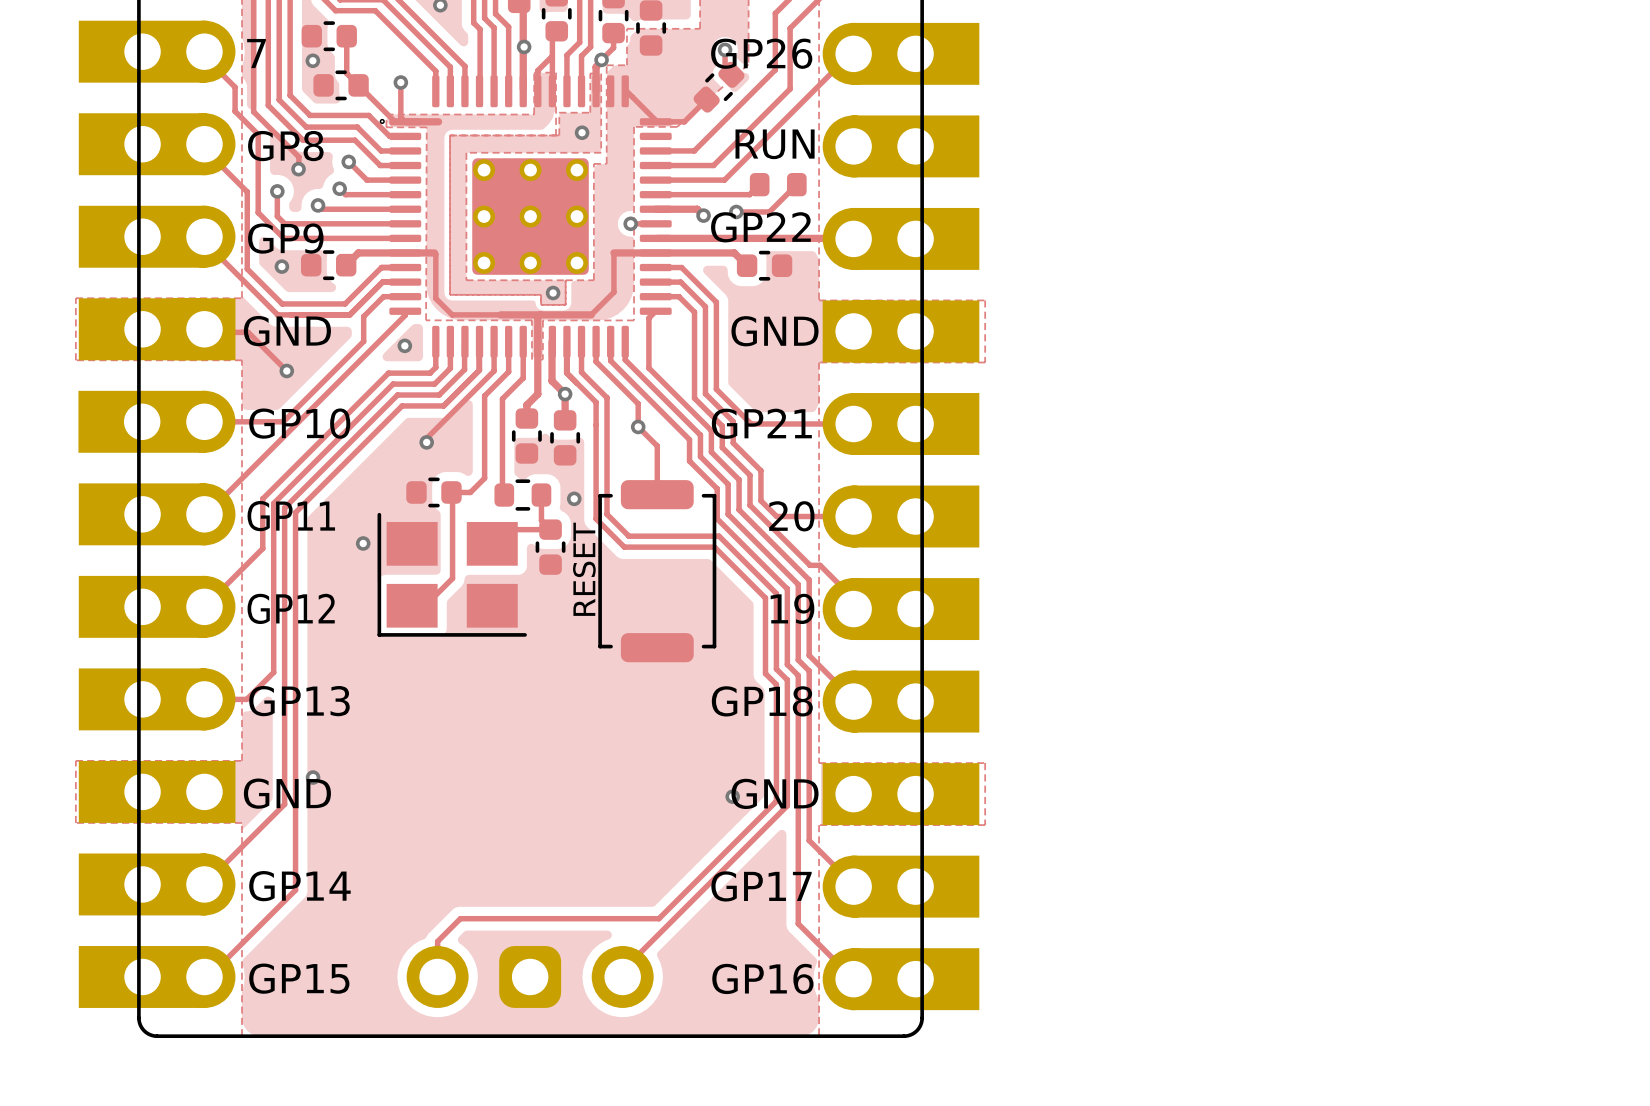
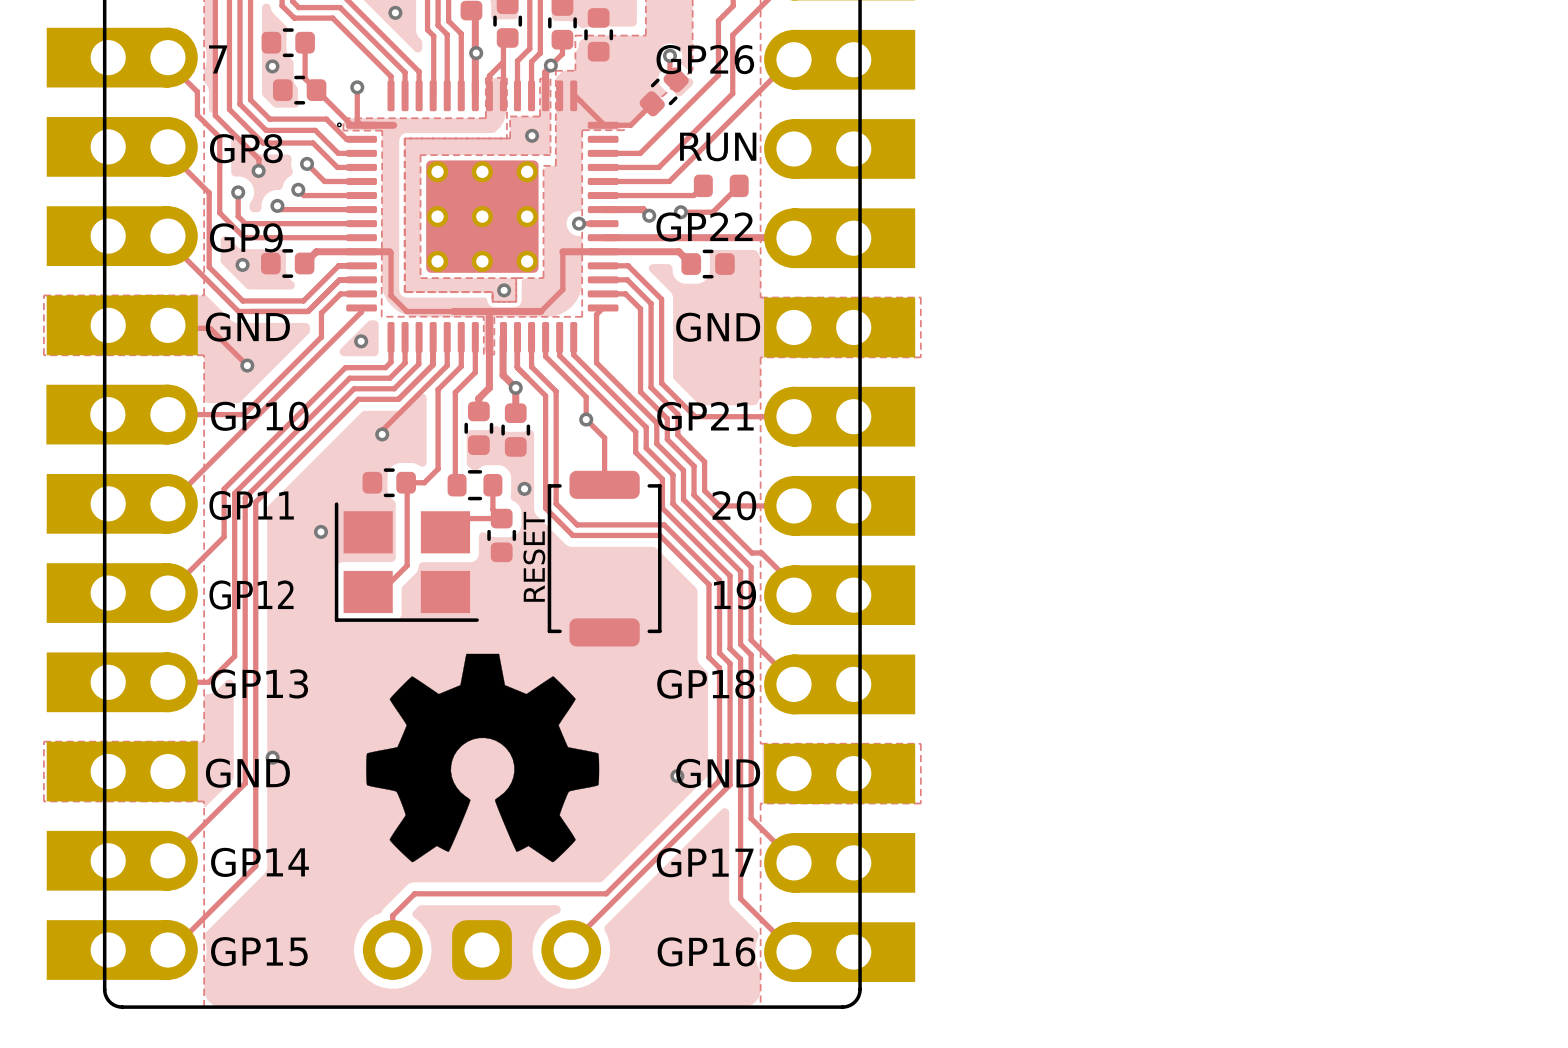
drawing: none -> [366, 653, 600, 863]

